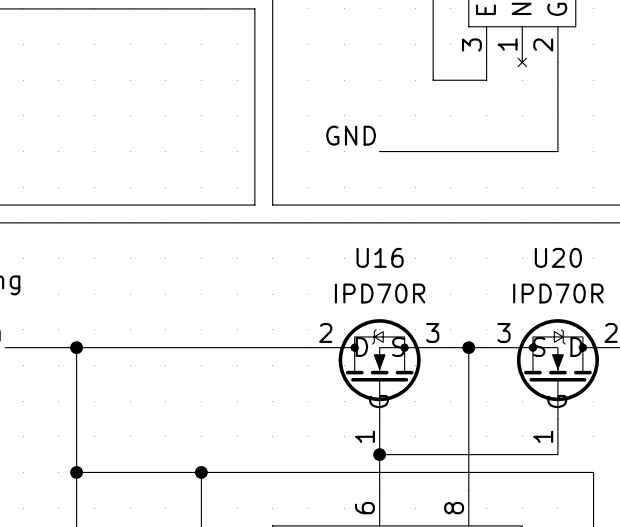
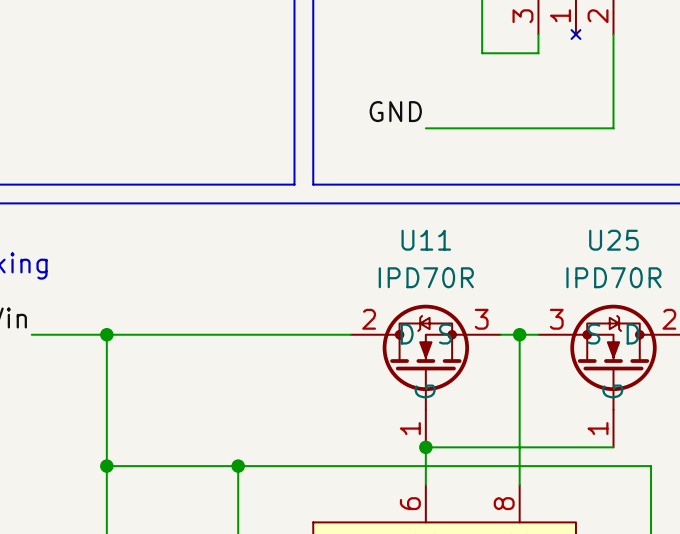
U16 name: U16 (380, 257) -> U11 (426, 240)
U20 name: U20 (558, 257) -> U25 (613, 240)

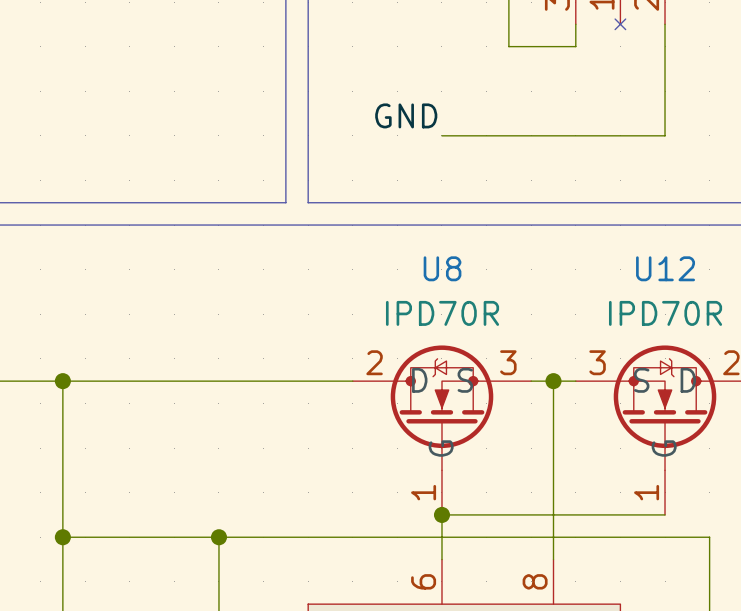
U11 name: U11 (426, 240) -> U8 (442, 268)
U25 name: U25 (613, 240) -> U12 (665, 268)

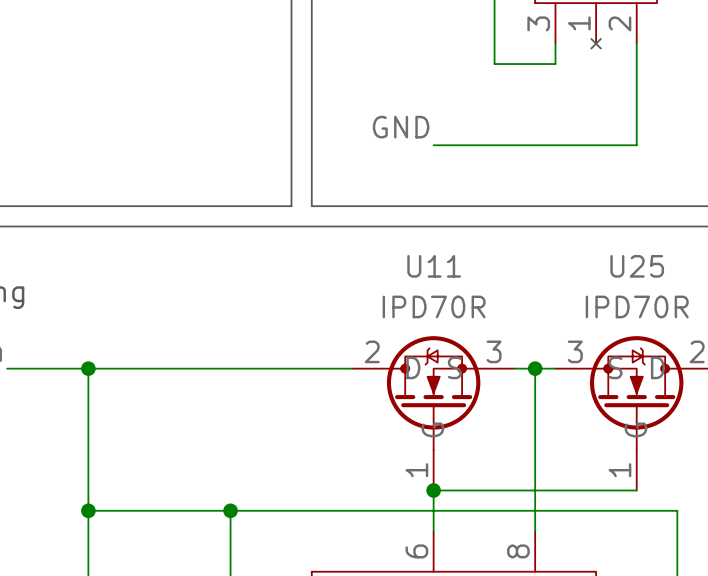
U8 name: U8 (442, 268) -> U11 (434, 266)
U12 name: U12 (665, 268) -> U25 (637, 266)

